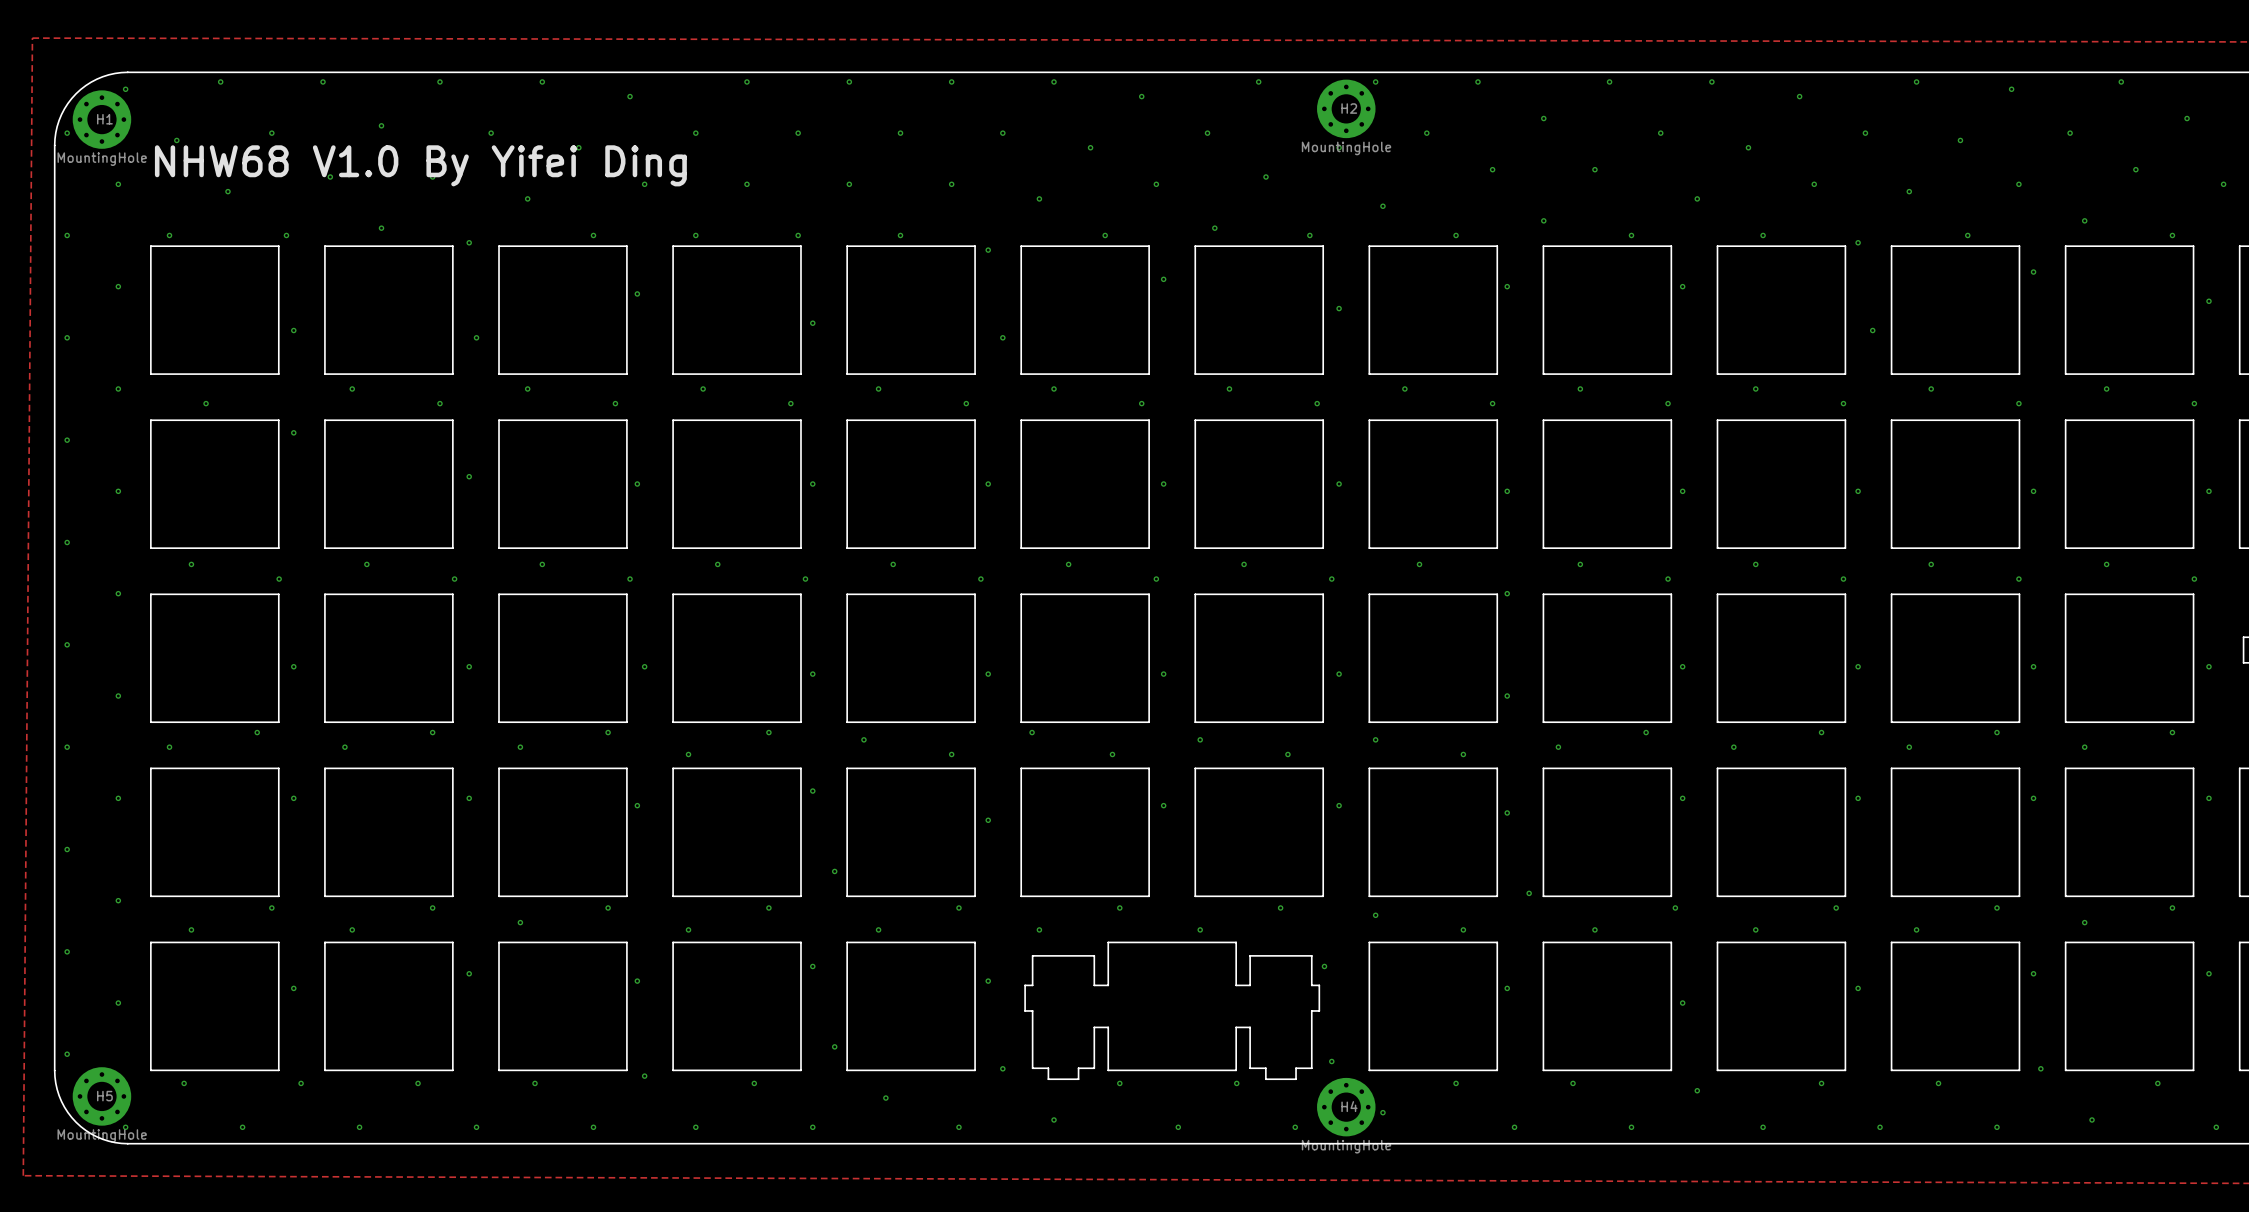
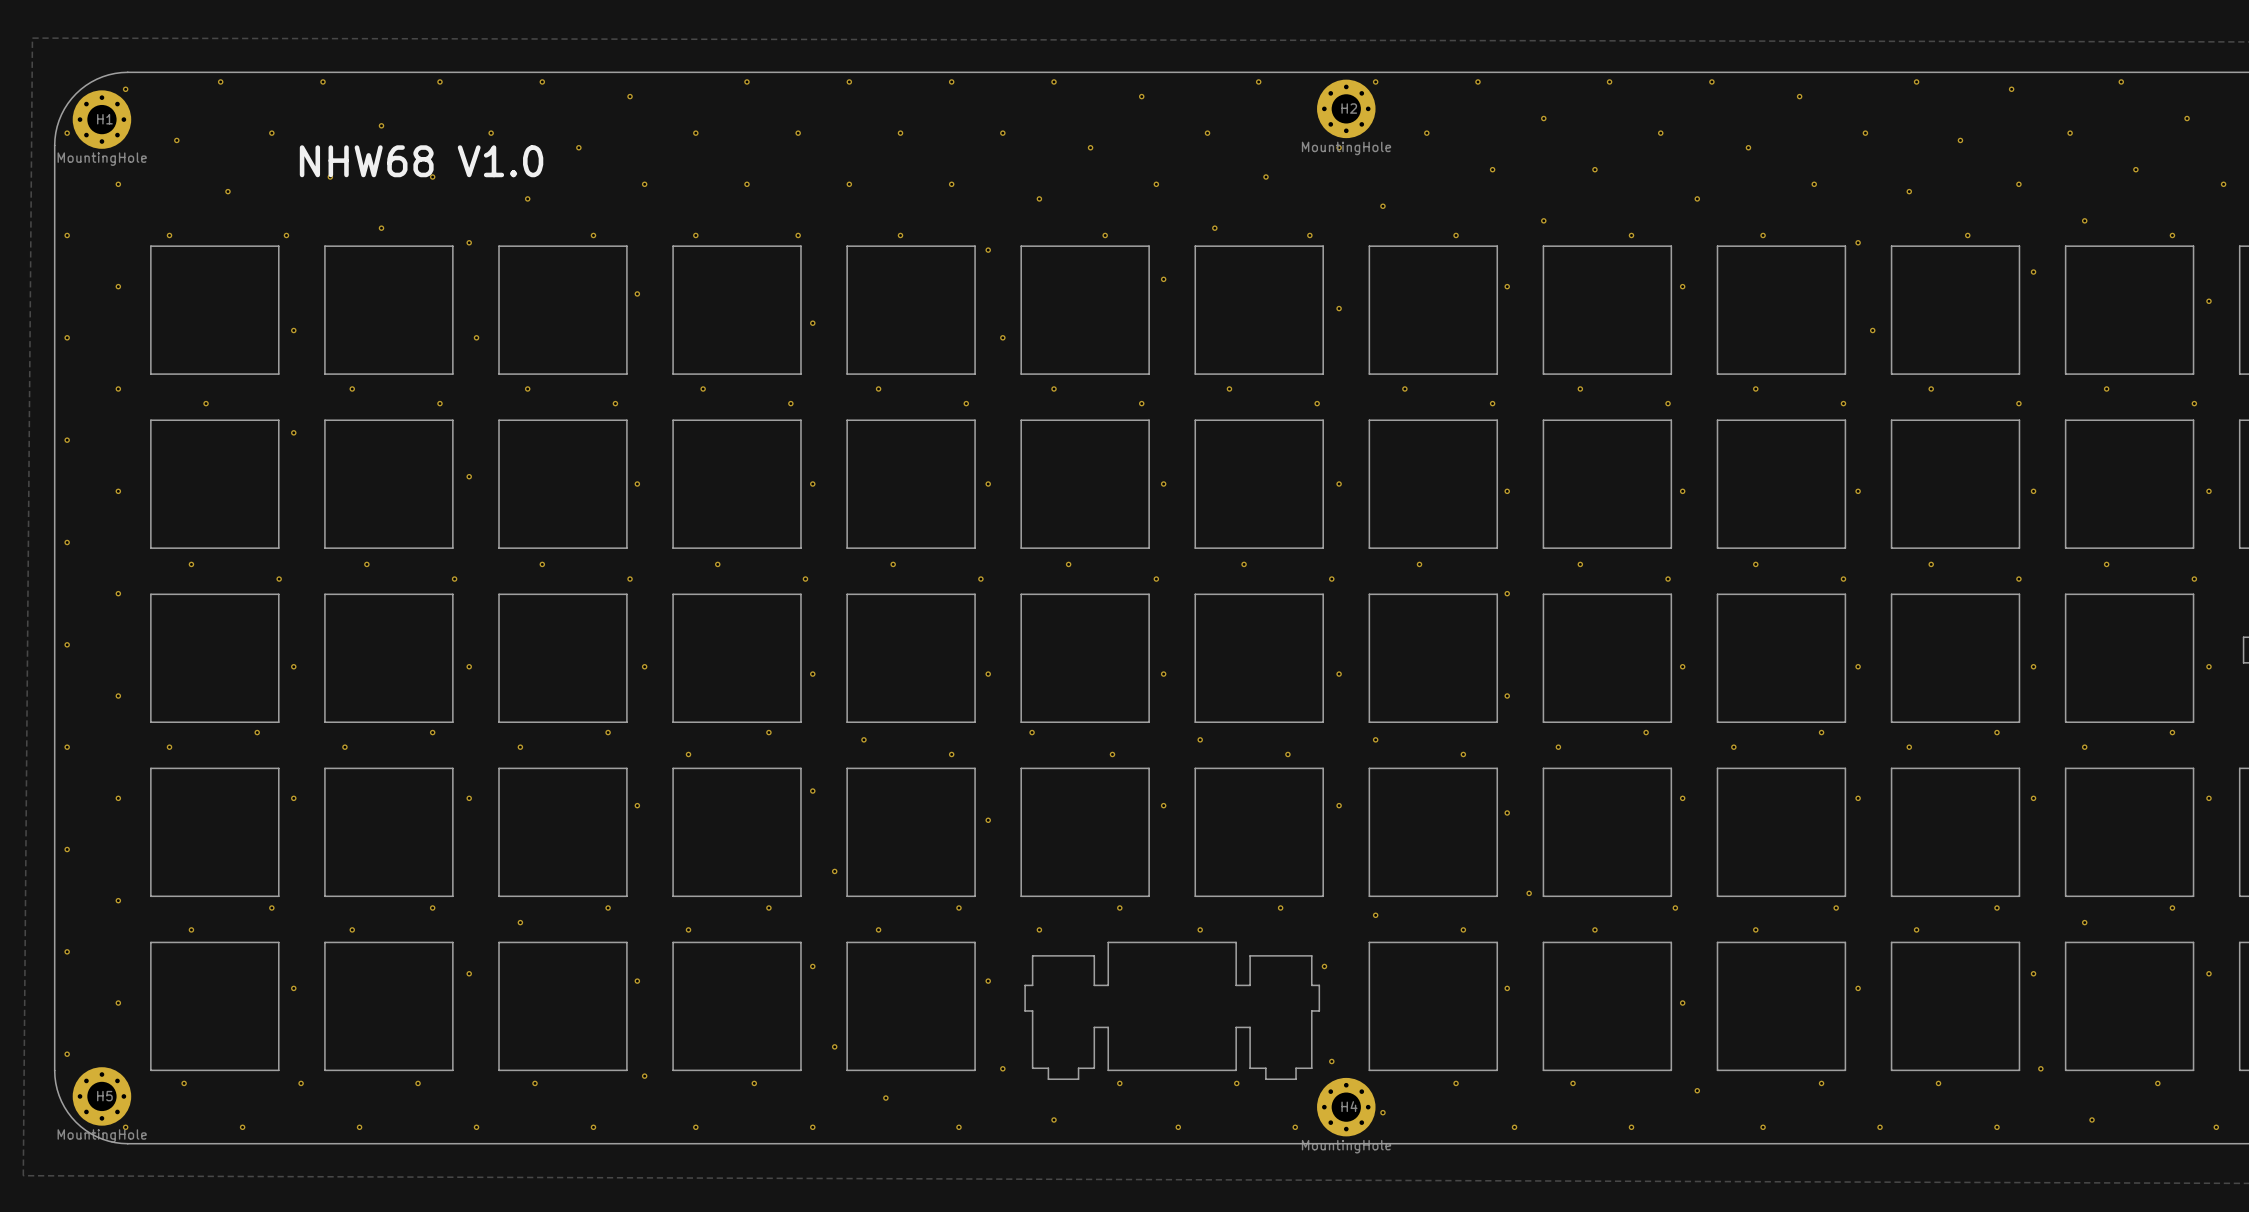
text: NHW68 V1.0 By Yifei Ding (420, 165) -> NHW68 V1.0 (421, 161)

